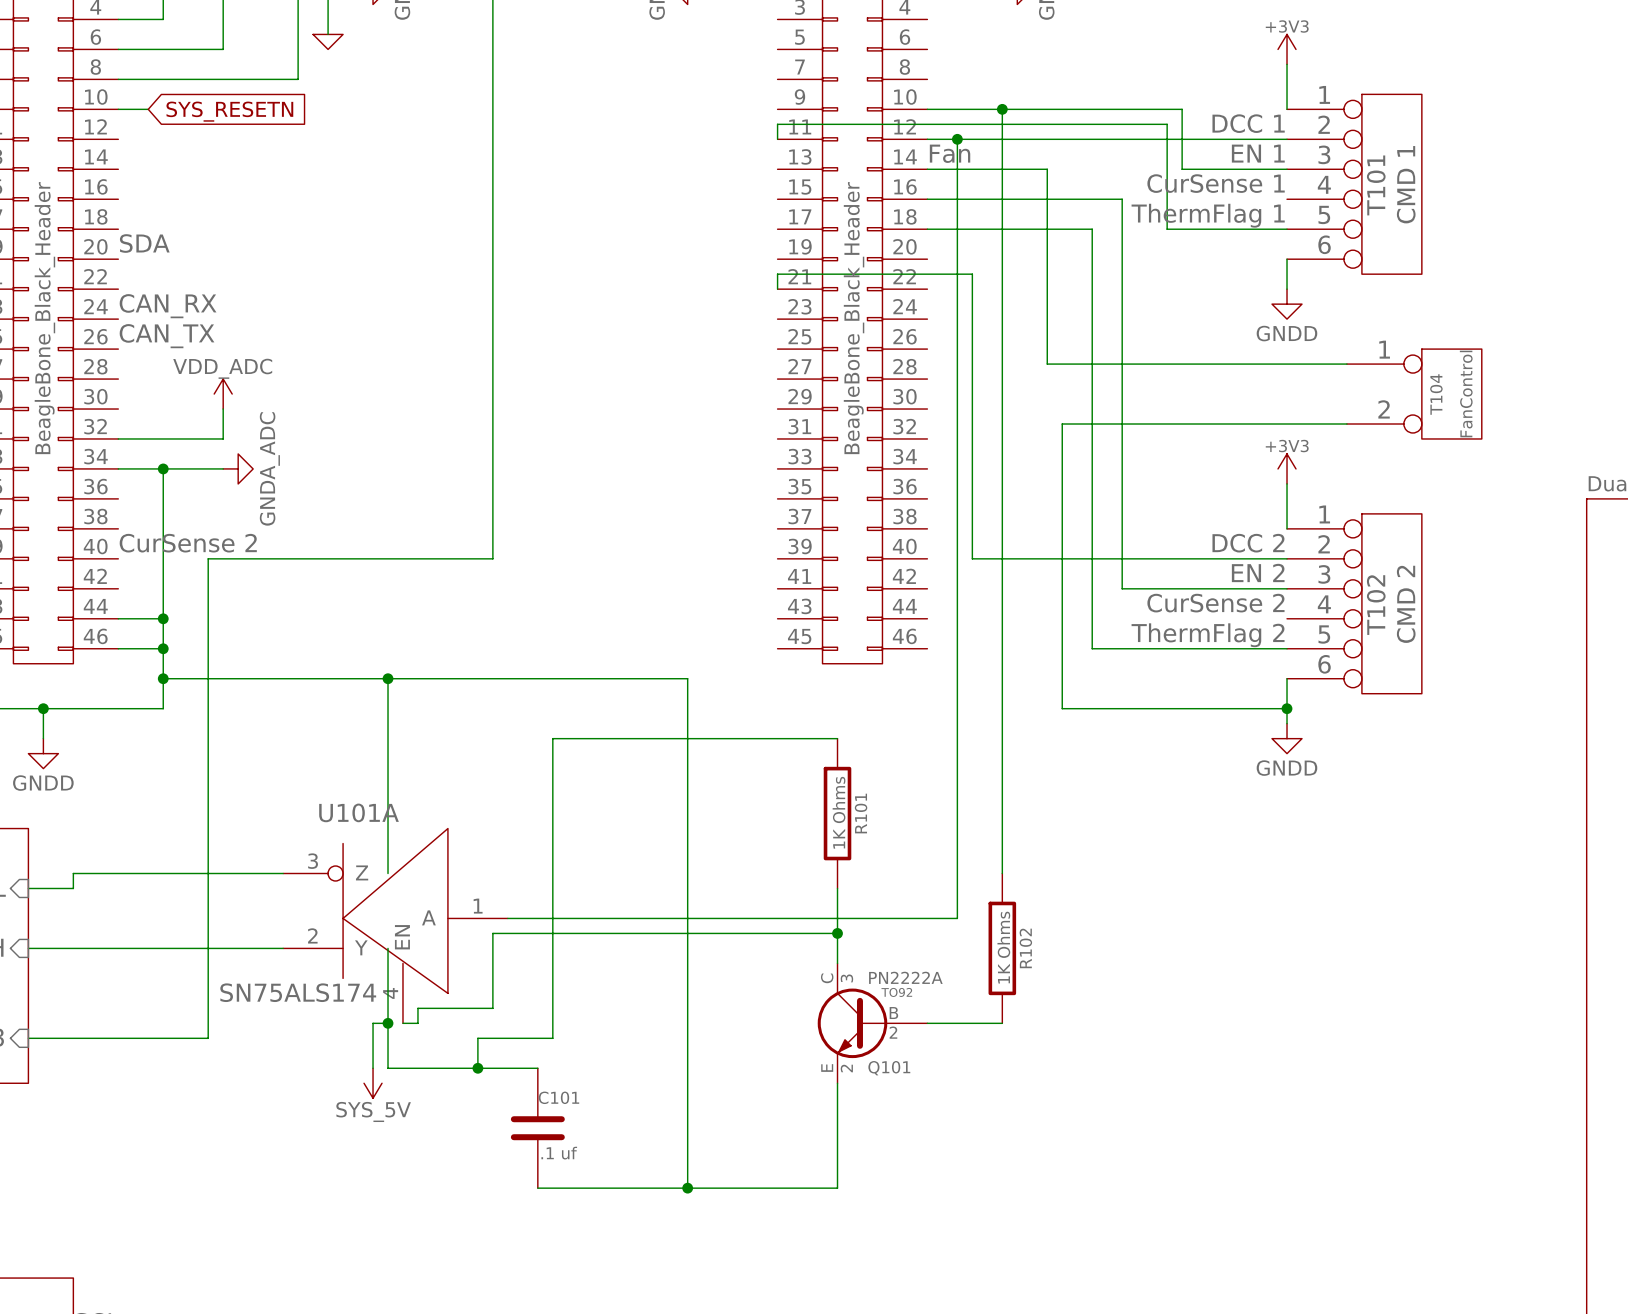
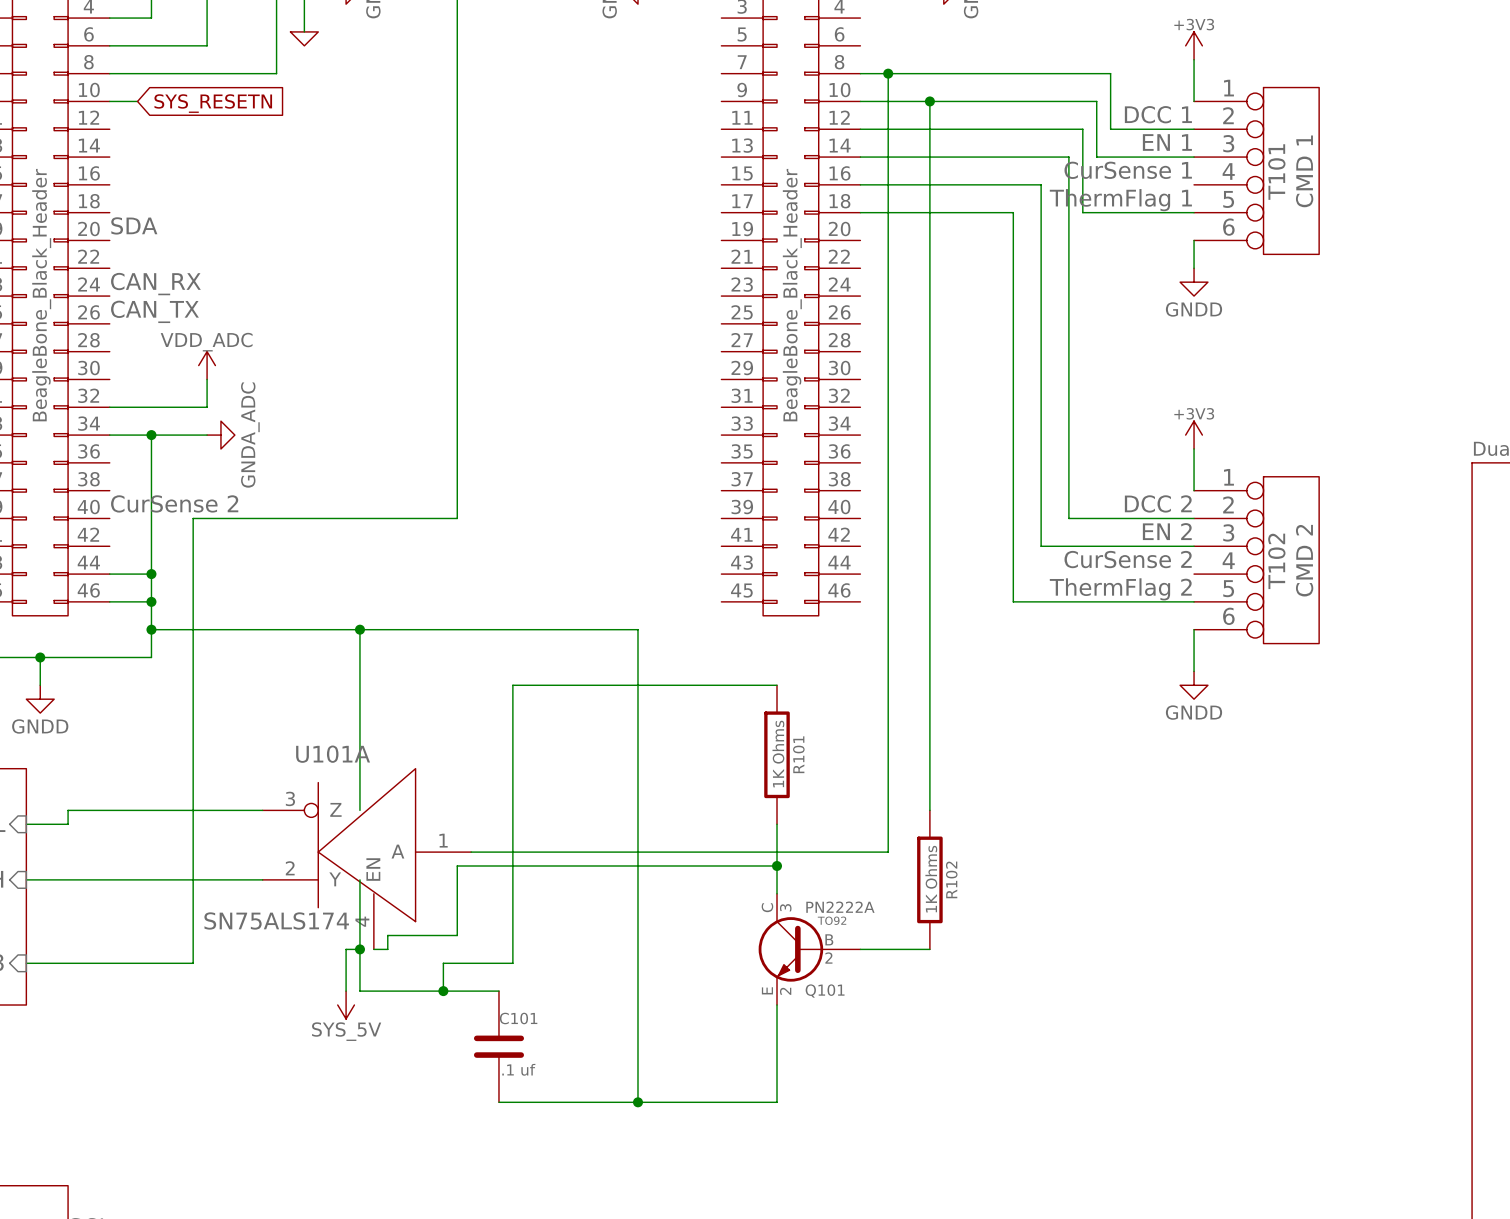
wire: none -> (888, 73) (888, 129)
wire: (777, 139) (777, 124) (1167, 124) (1167, 139) (1197, 139) -> (860, 73) (1110, 73) (1110, 129)
junction position: (957, 139) -> (888, 73)
label: Fan (950, 153) -> none
wire: (1047, 169) (1047, 364) (1346, 364) -> (971, 157) (1068, 157) (1068, 518)
wire: (777, 289) (777, 274) (972, 274) (972, 558) (1152, 558) -> none
T104: FanControl (1414, 394) -> none
wire: (1346, 424) (1062, 424) (1062, 708) (1287, 708) -> none
junction: (1287, 708) -> none

